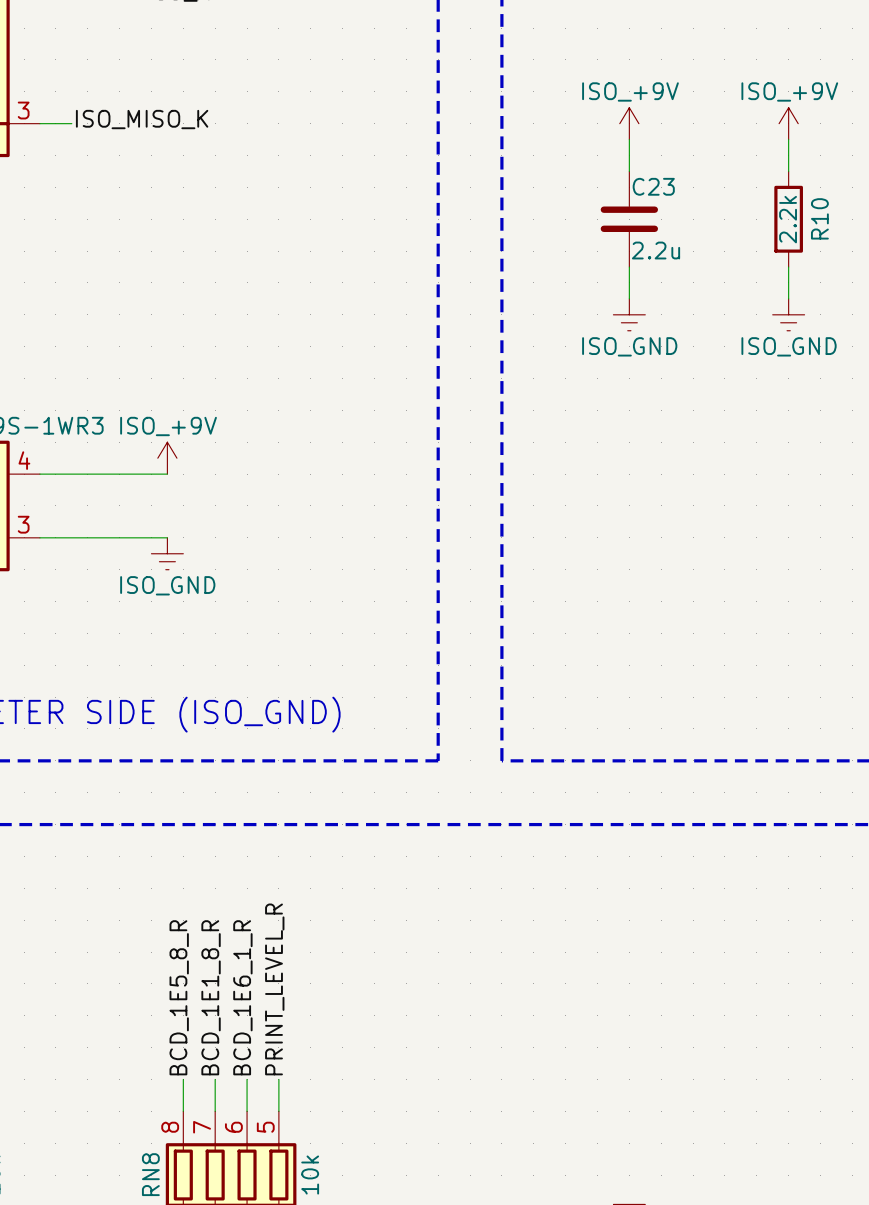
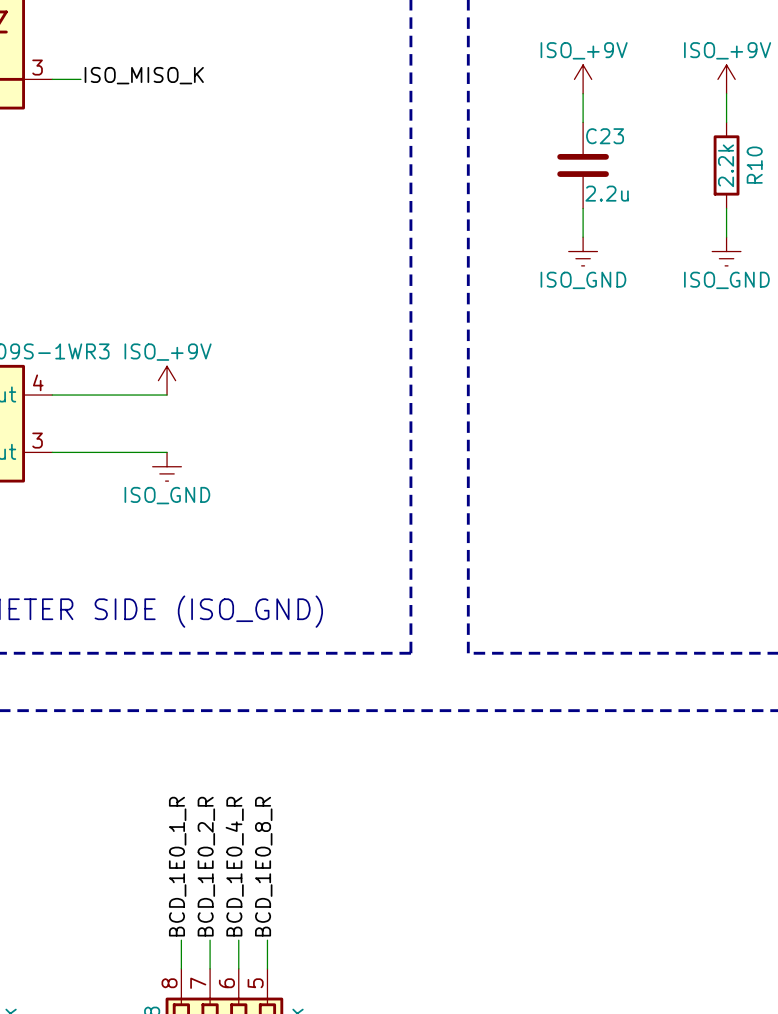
label: PRINT_LEVEL_R (274, 989) -> BCD_1E0_8_R (263, 866)
label: BCD_1E5_8_R (179, 997) -> BCD_1E0_1_R (177, 866)
label: BCD_1E1_8_R (211, 997) -> BCD_1E0_2_R (206, 866)
label: BCD_1E6_1_R (242, 997) -> BCD_1E0_4_R (234, 866)

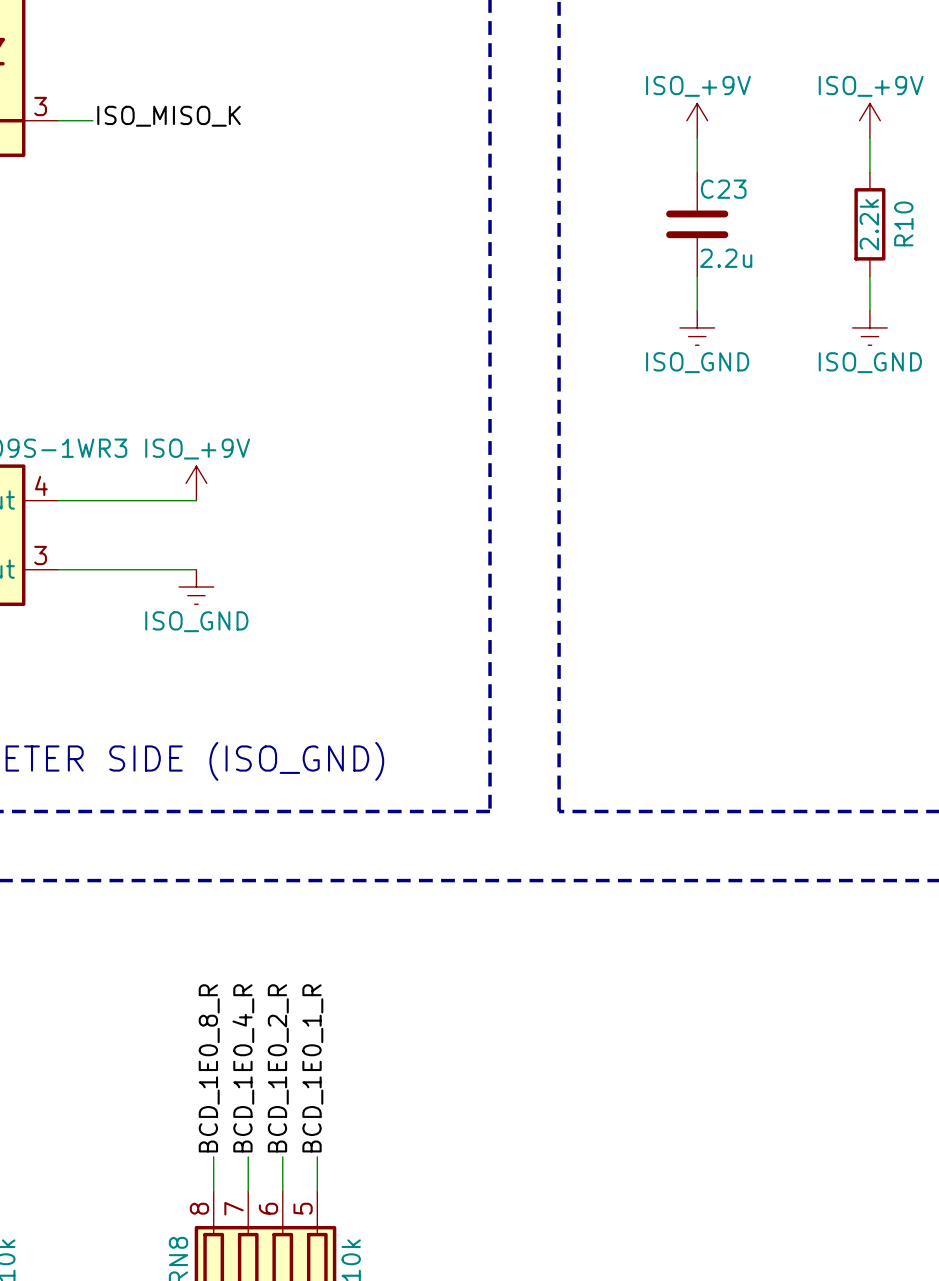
label: BCD_1E0_1_R (177, 866) -> BCD_1E0_8_R (209, 1068)
label: BCD_1E0_2_R (206, 866) -> BCD_1E0_4_R (243, 1068)
label: BCD_1E0_4_R (234, 866) -> BCD_1E0_2_R (278, 1068)
label: BCD_1E0_8_R (263, 866) -> BCD_1E0_1_R (312, 1068)

